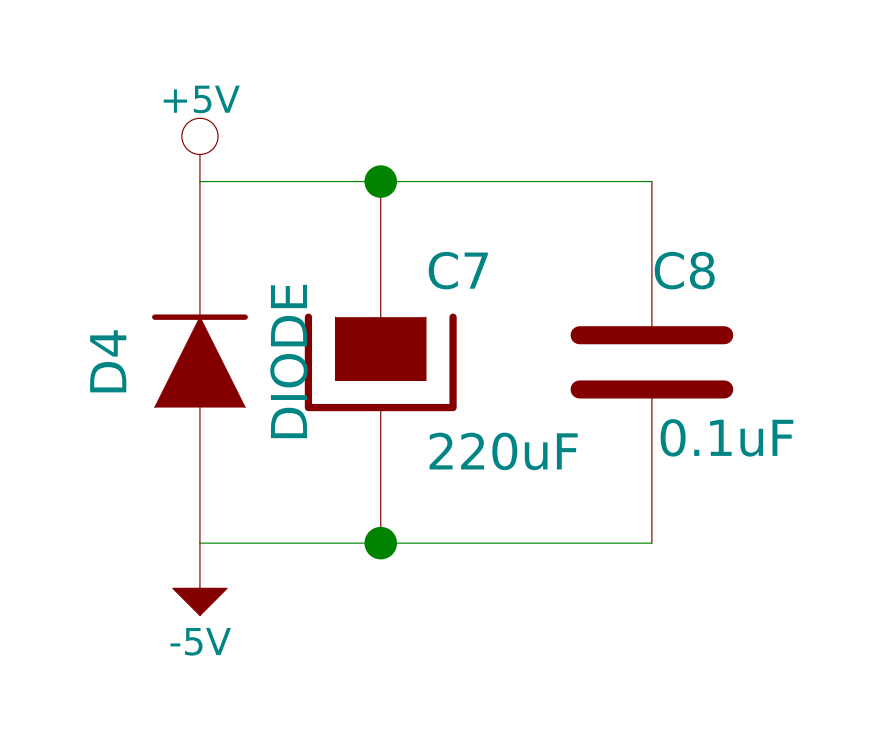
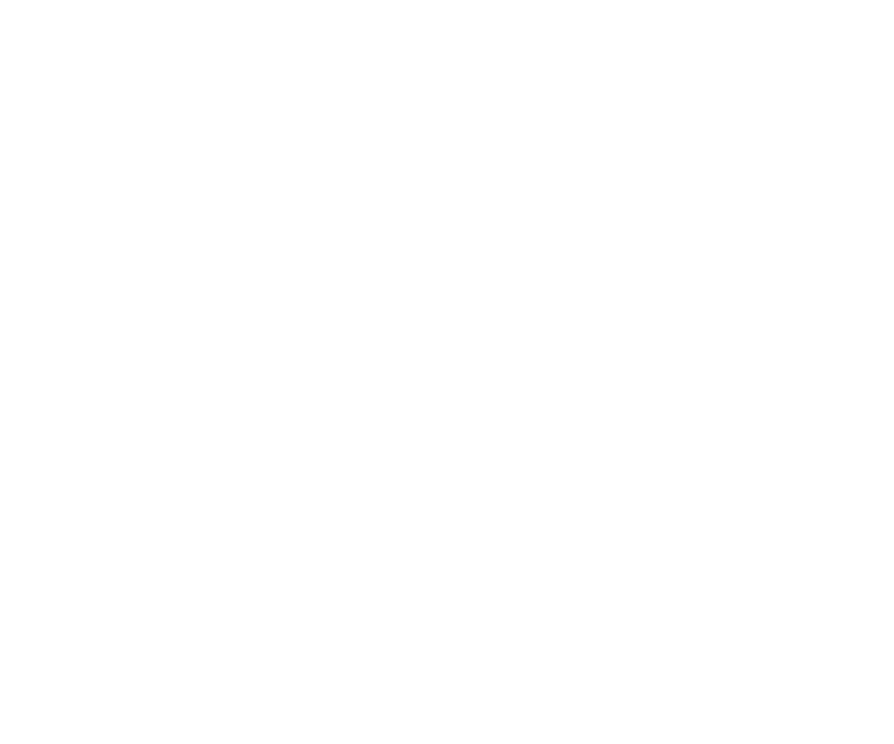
power symbol: +5V (199, 149) -> none
wire: (199, 181) (651, 181) -> none
junction: (380, 181) -> none
D4: DIODE (199, 362) -> none
C7: 220uF (380, 362) -> none
C8: 0.1uF (651, 362) -> none
wire: (199, 543) (651, 543) -> none
junction: (380, 543) -> none
power symbol: -5V (199, 579) -> none

